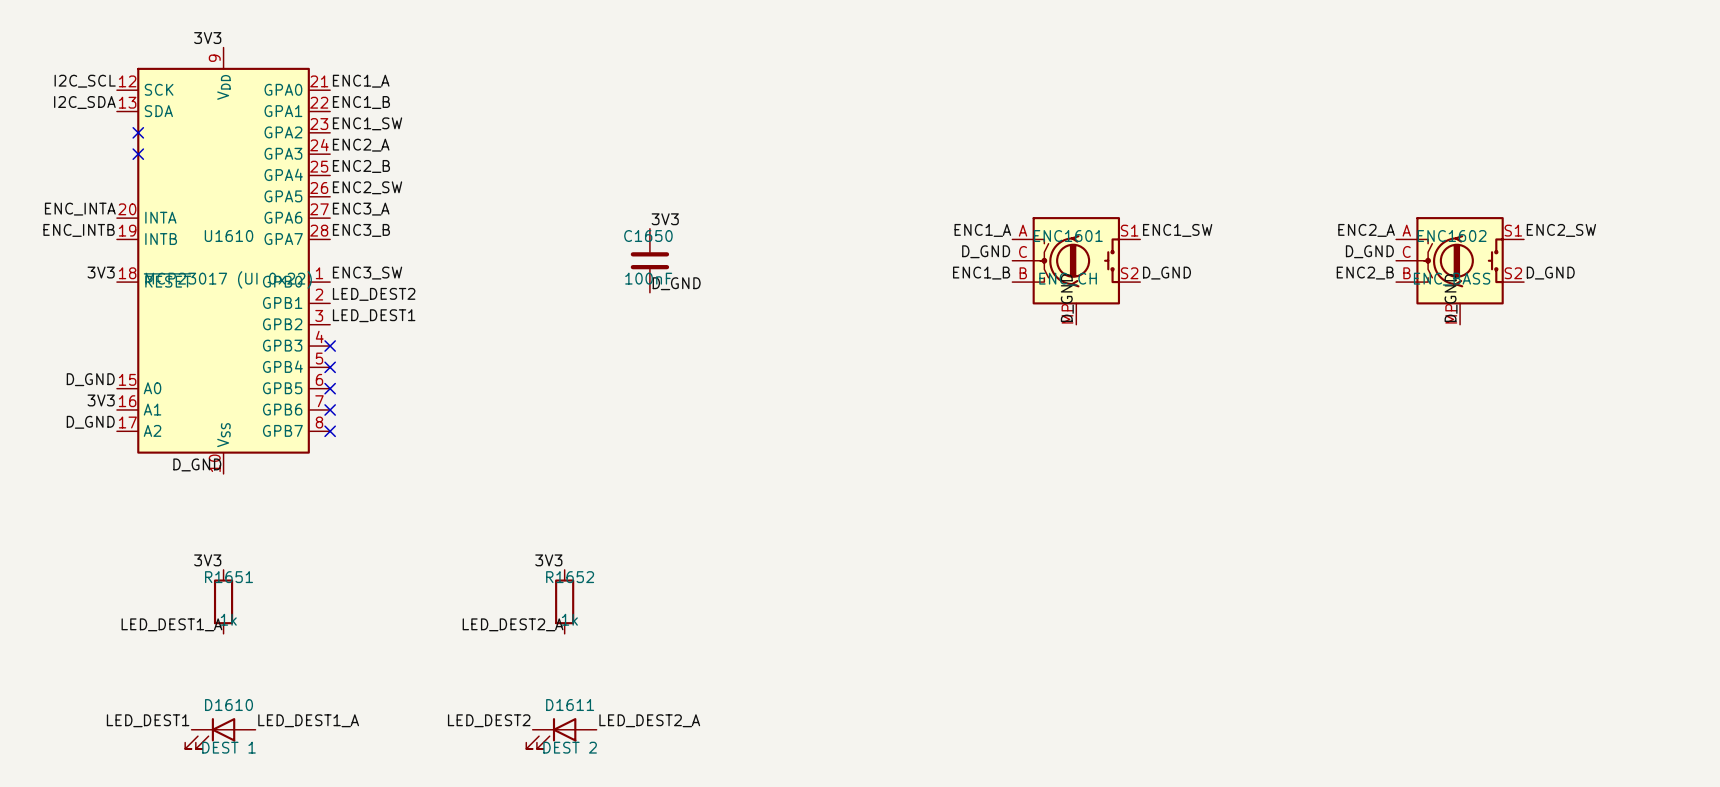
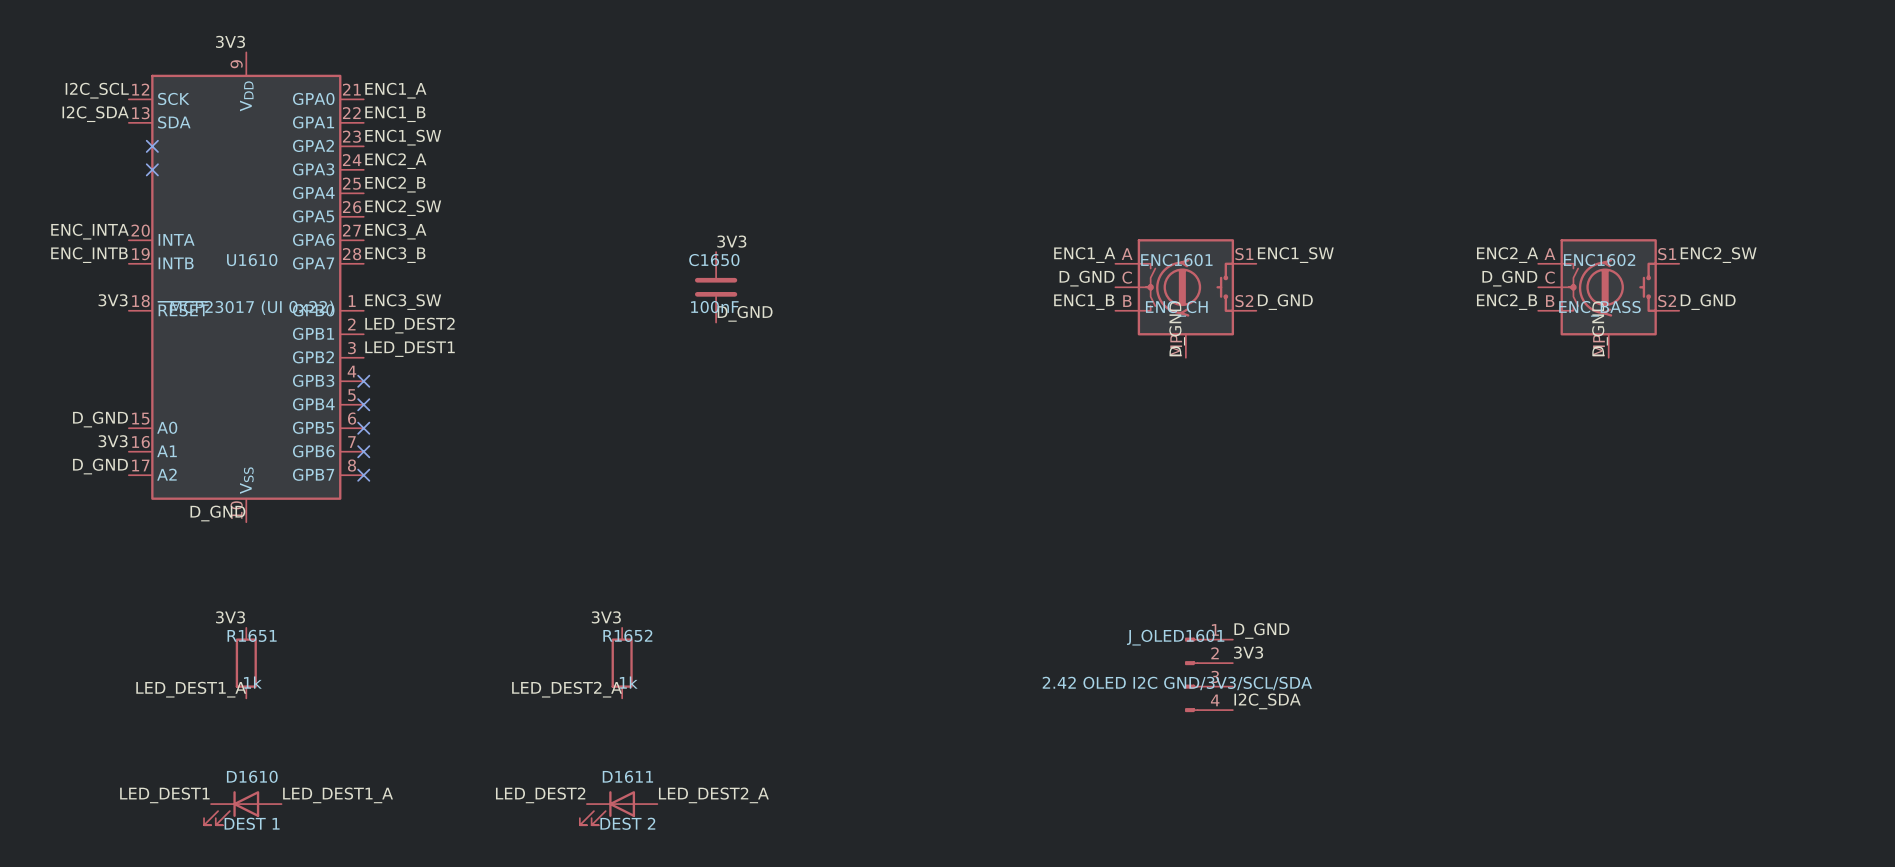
label: none -> D_GND (1261, 630)
label: none -> 3V3 (1248, 652)
J_OLED1601: none -> 2.42 OLED I2C GND/3V3/SCL/SDA (1209, 674)
label: none -> I2C_SDA (1267, 701)

